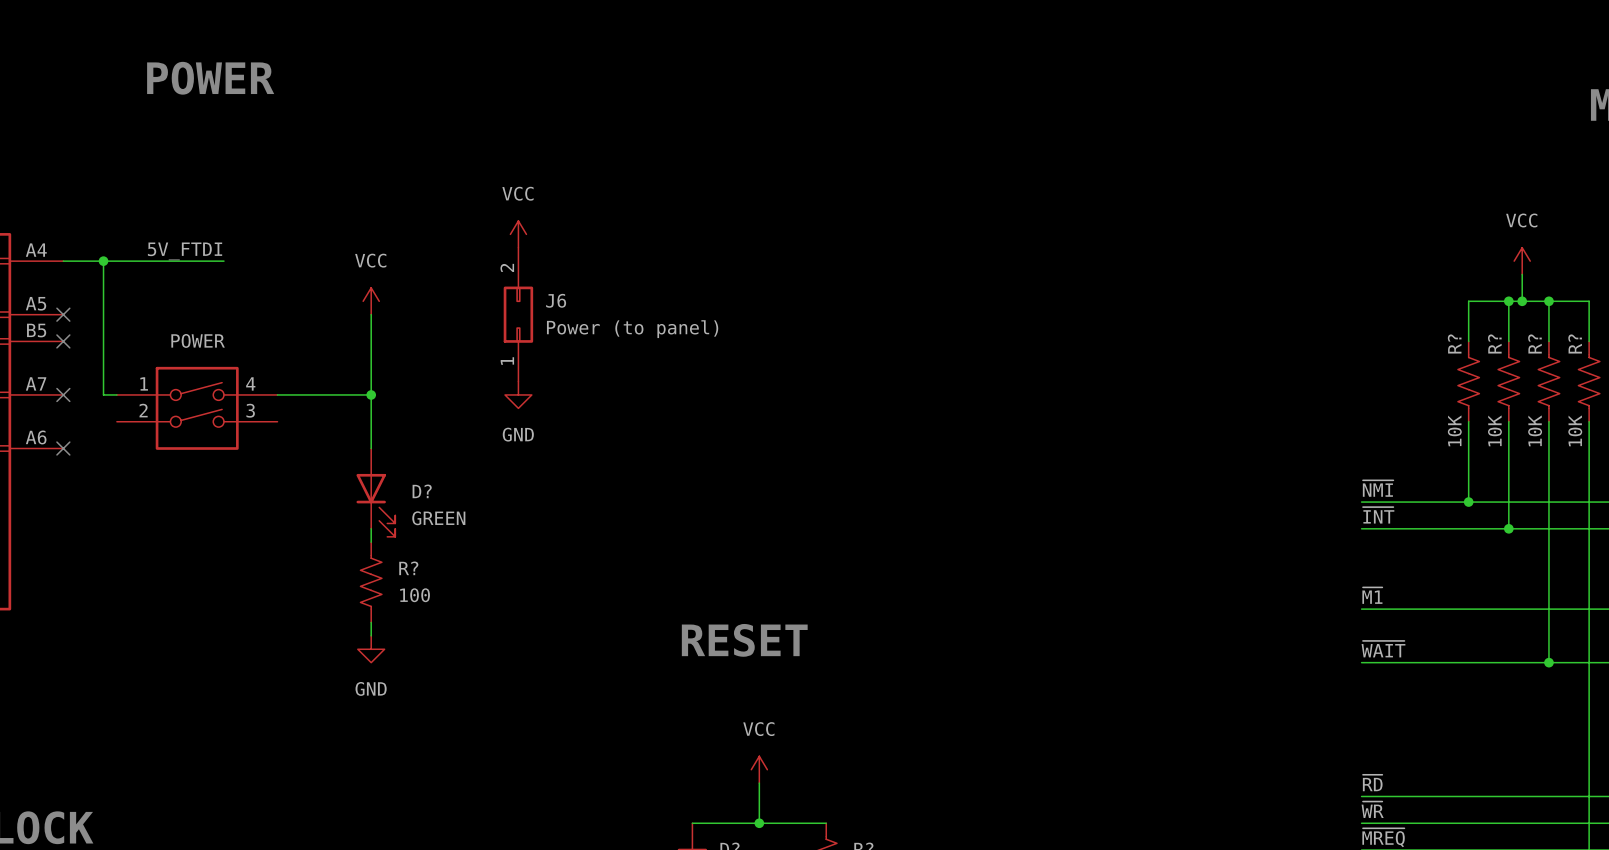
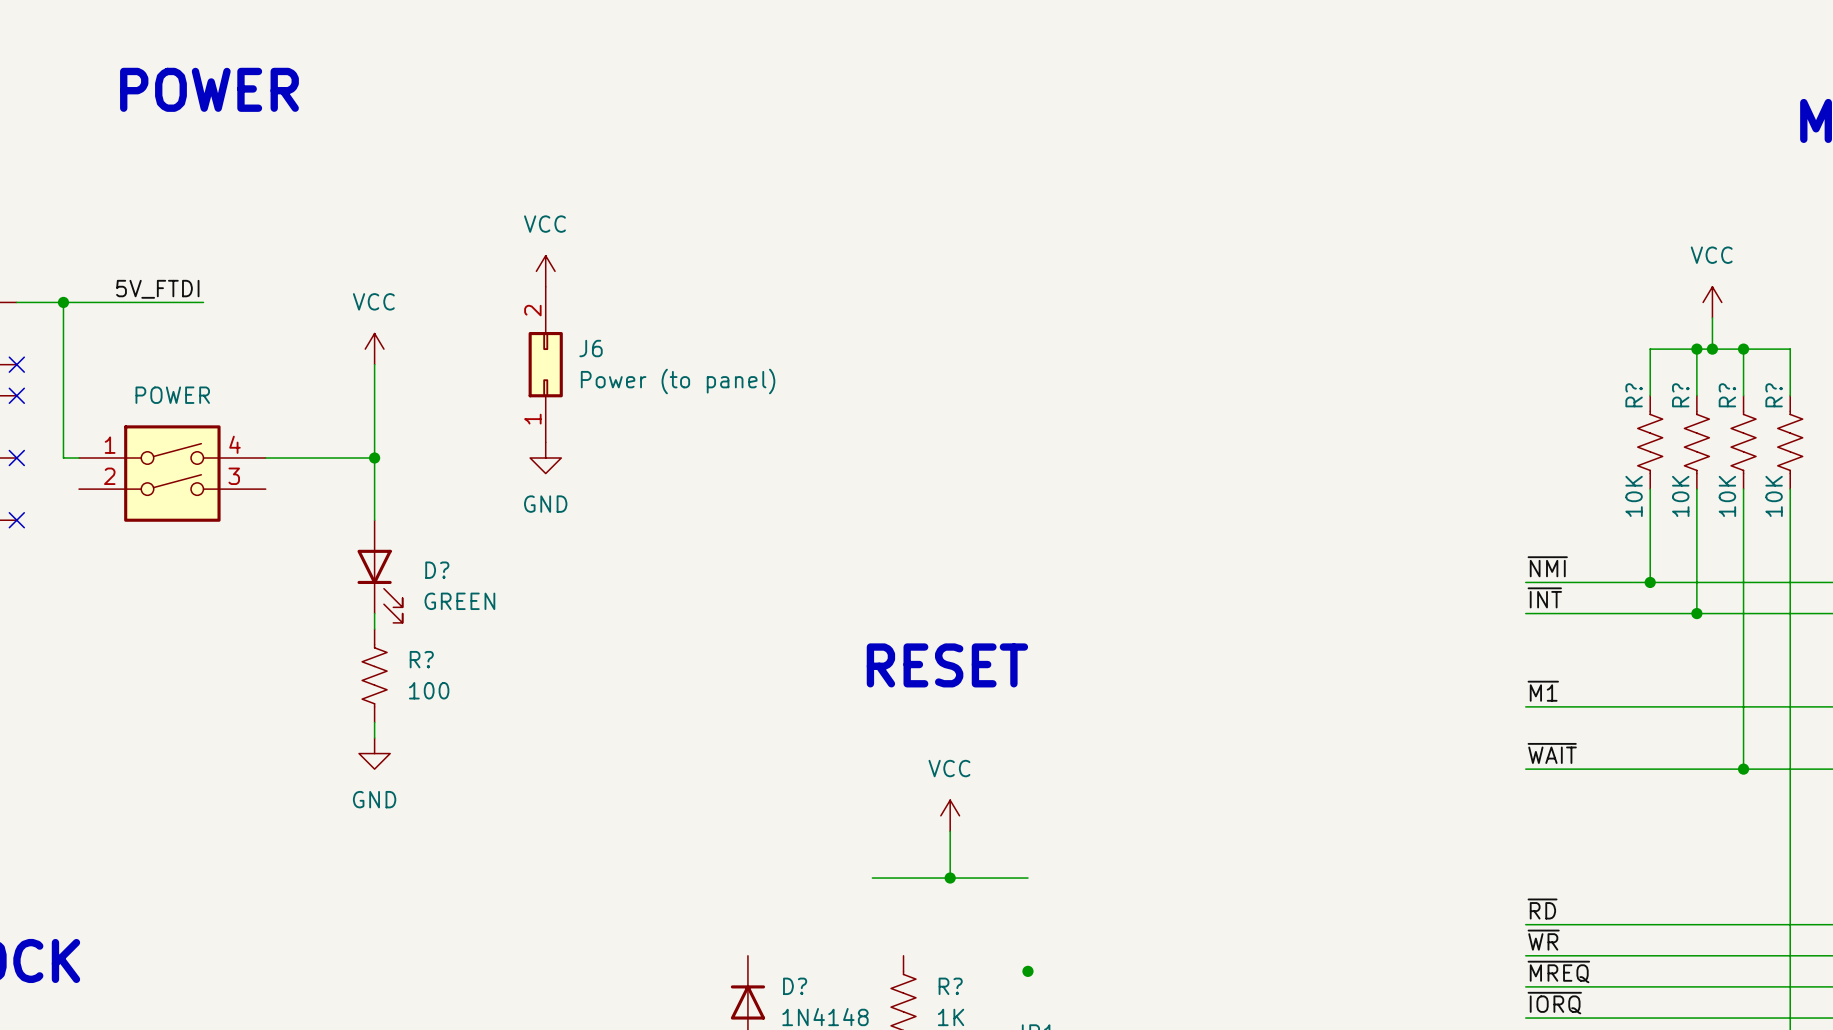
text position: RESET (744, 640) -> RESET (947, 665)
junction: none -> (950, 878)
power symbol position: VCC (759, 769) -> VCC (950, 815)
wire: (759, 783) (759, 823) -> (950, 831) (950, 878)
wire: (692, 823) (826, 823) -> (872, 878) (1027, 878)
junction: (759, 823) -> none
junction: none -> (1027, 971)

